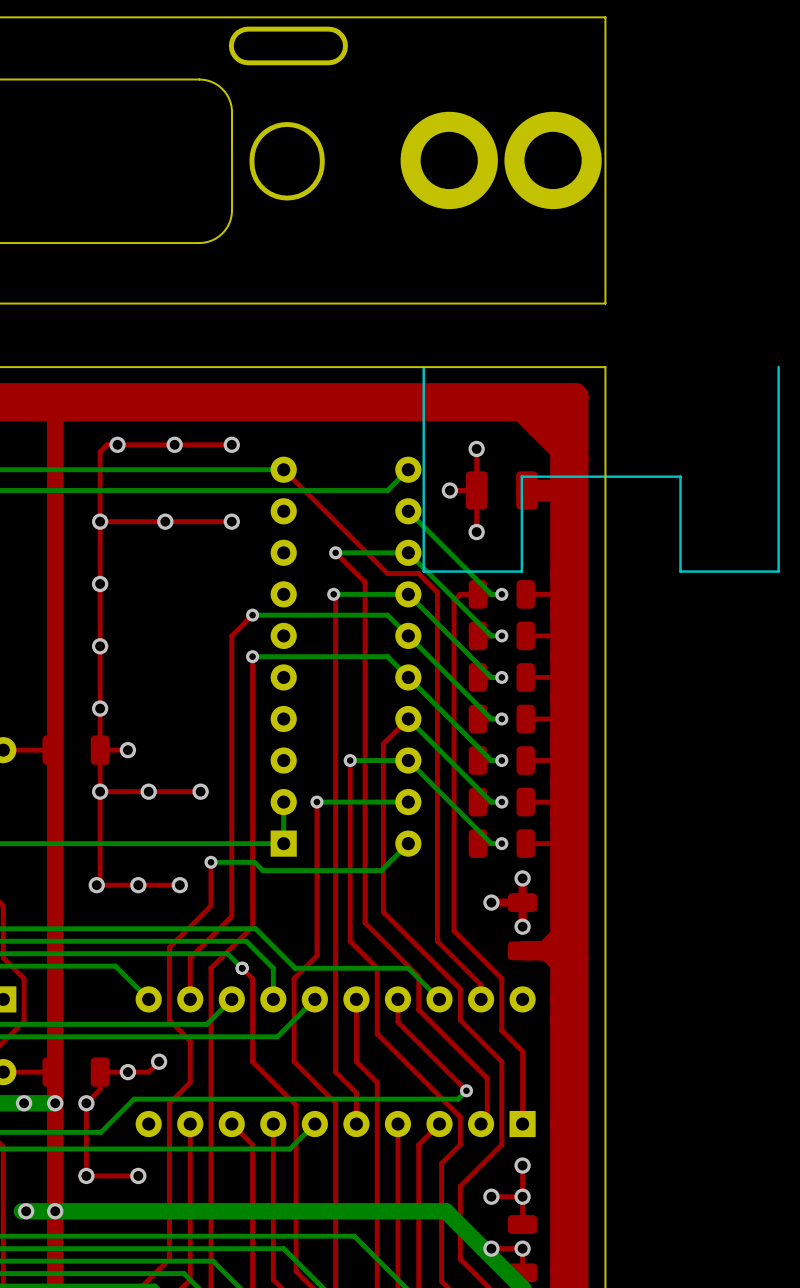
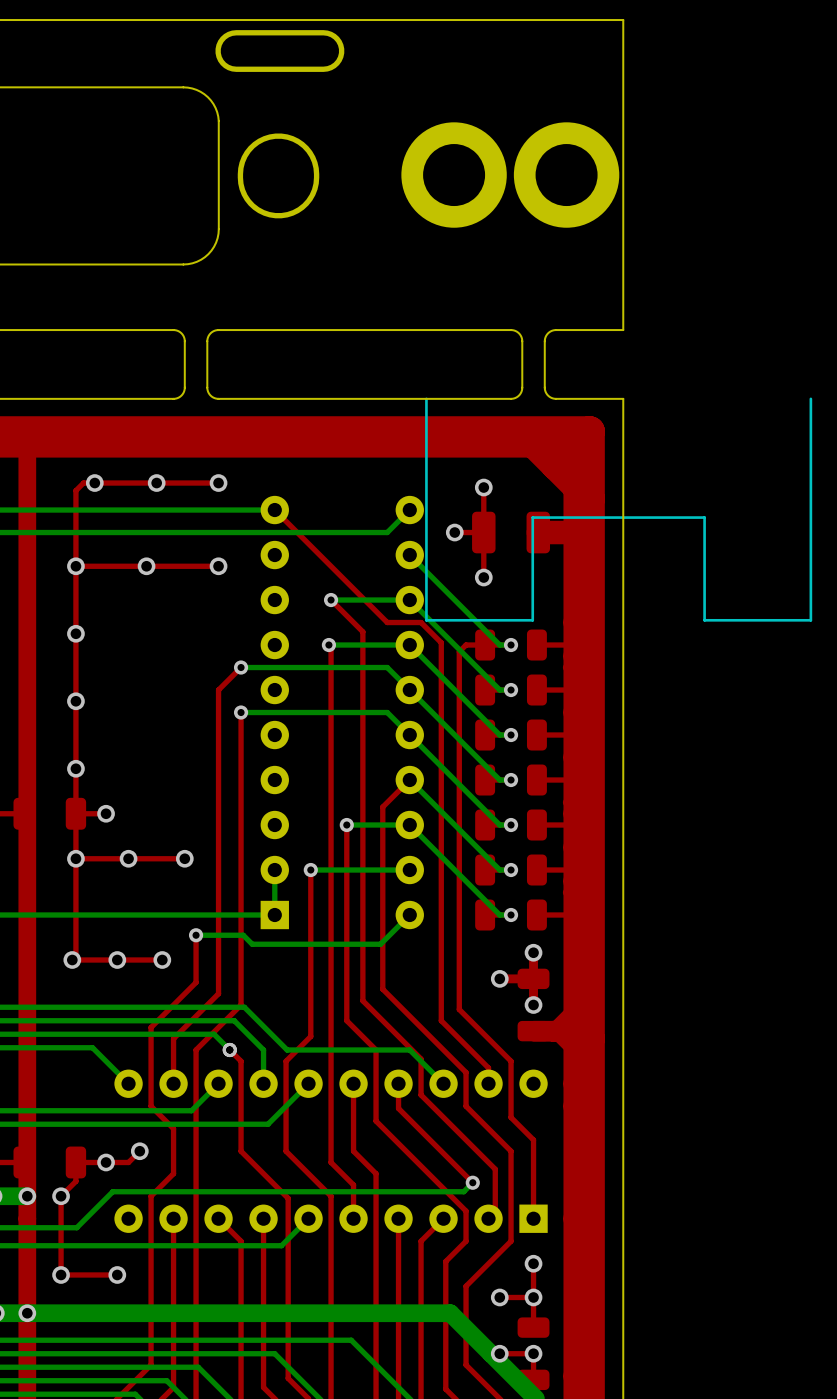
board edge: (231, 303) (190, 303) -> (173, 398) (181, 395) (184, 387) (184, 339) (180, 332) (173, 330)
board edge: (543, 303) (501, 303) -> (511, 398) (517, 396) (522, 389) (522, 341) (518, 333) (511, 330)
board edge: (231, 367) (190, 367) -> (218, 398) (210, 395) (207, 387) (207, 339) (210, 333) (218, 330)
board edge: (543, 367) (501, 367) -> (556, 398) (548, 395) (544, 387) (544, 339) (549, 332) (556, 330)

